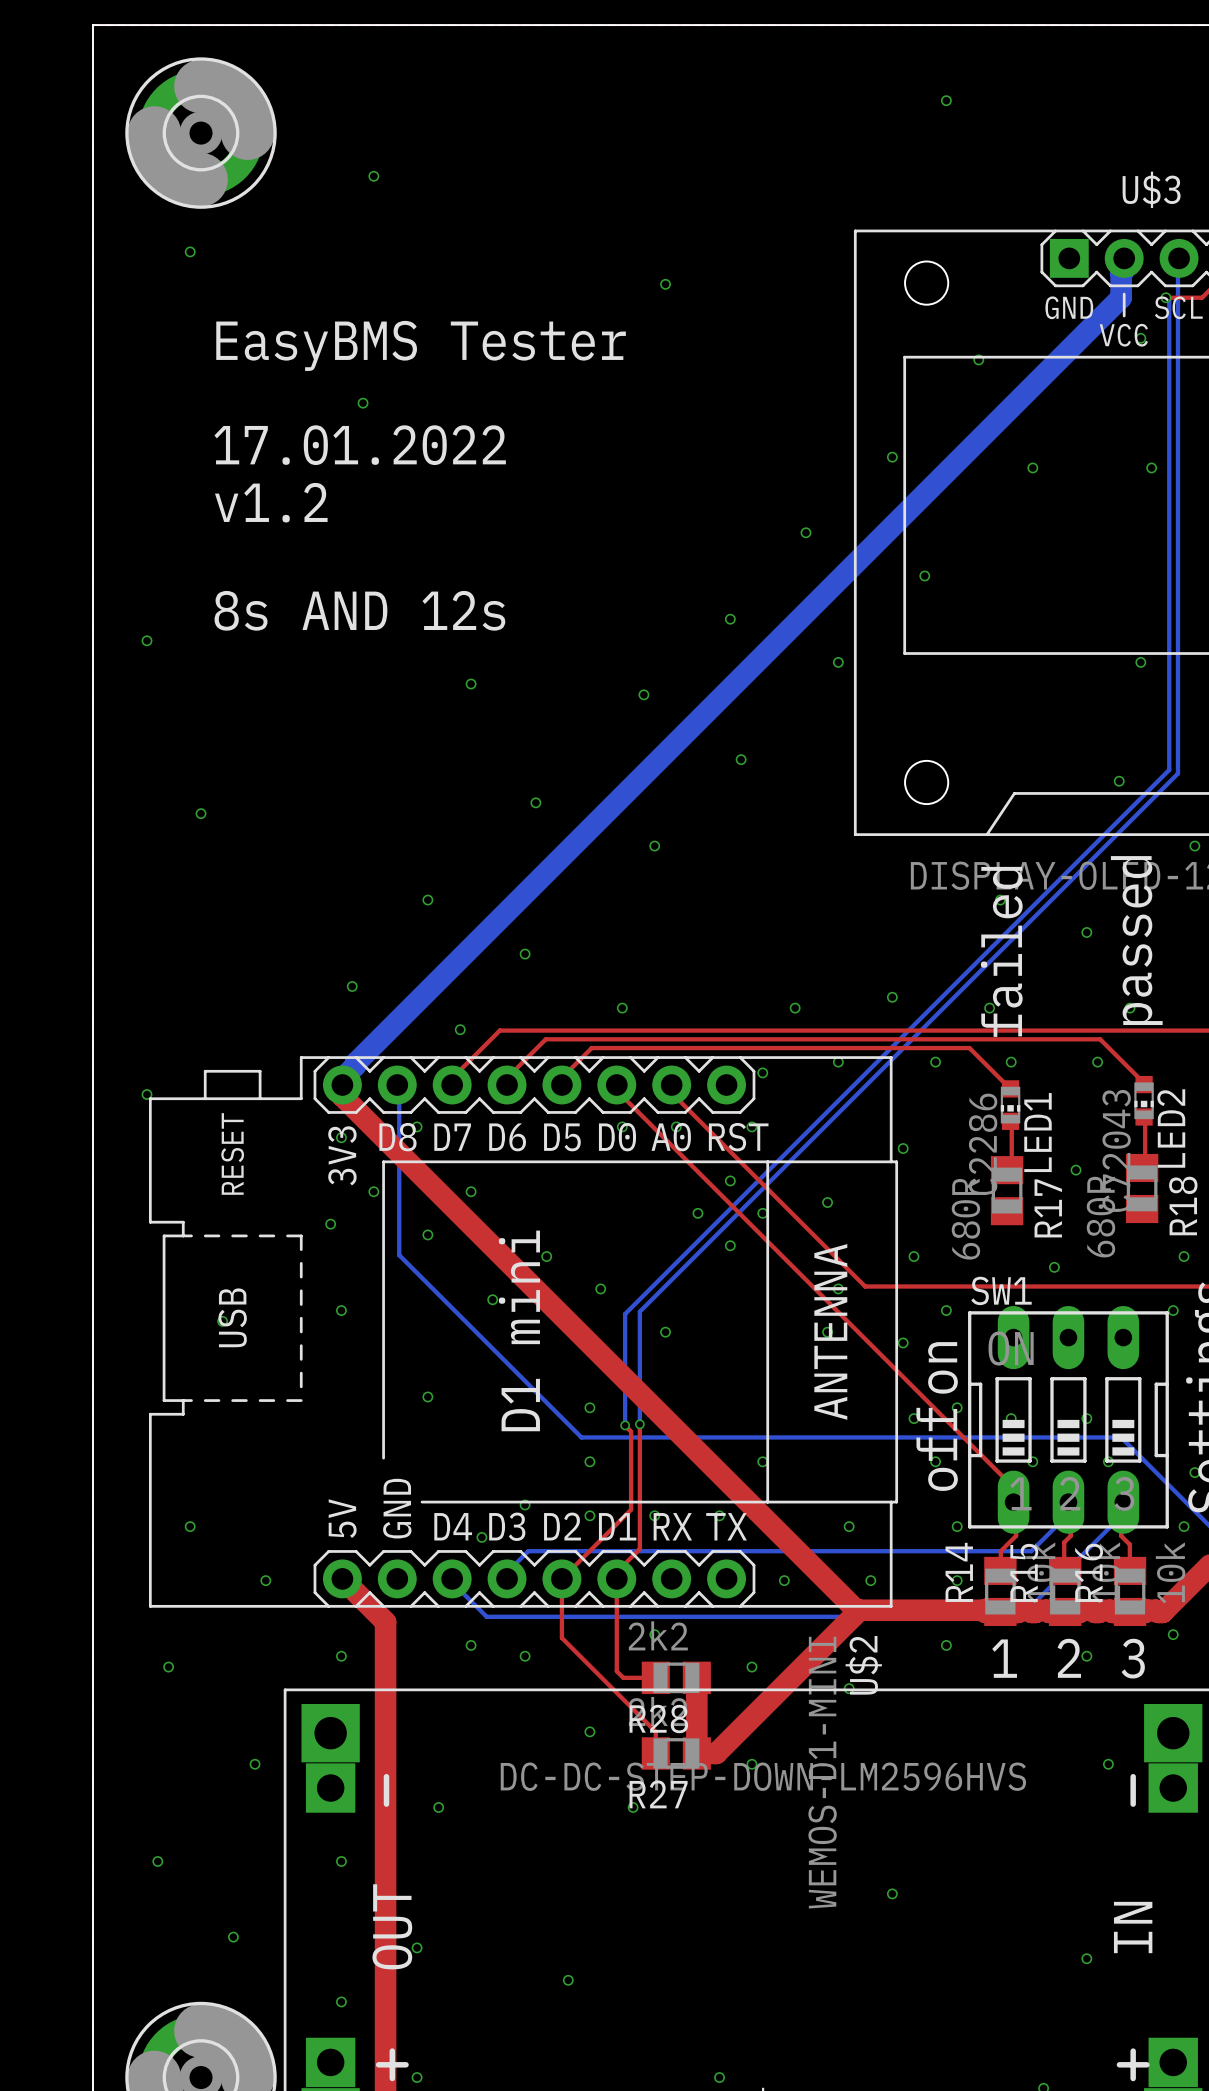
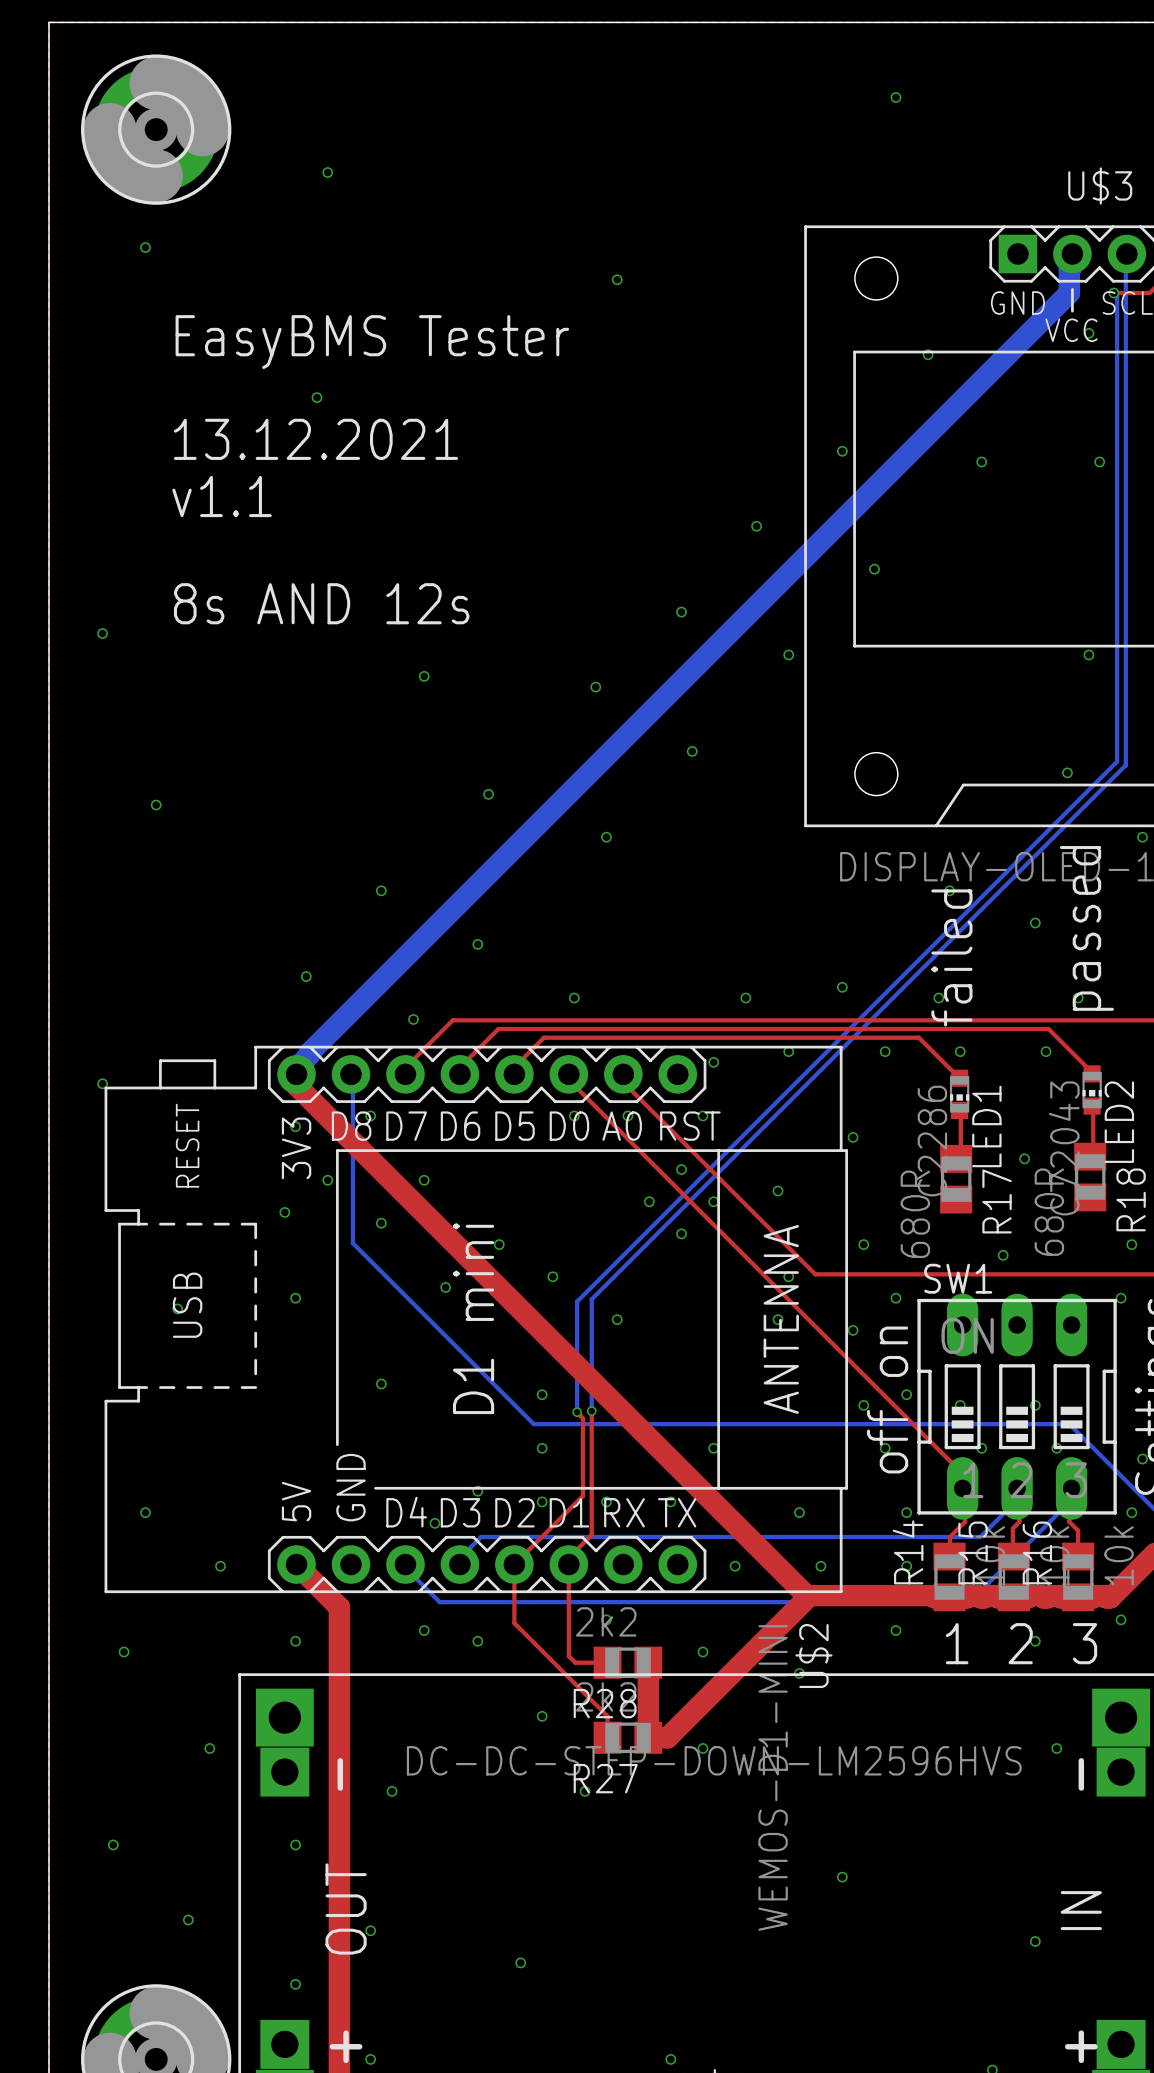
text: 17.01.2022 (360, 445) -> 13.12.2021 (315, 439)
text: v1.2 (271, 502) -> v1.1 (222, 496)

